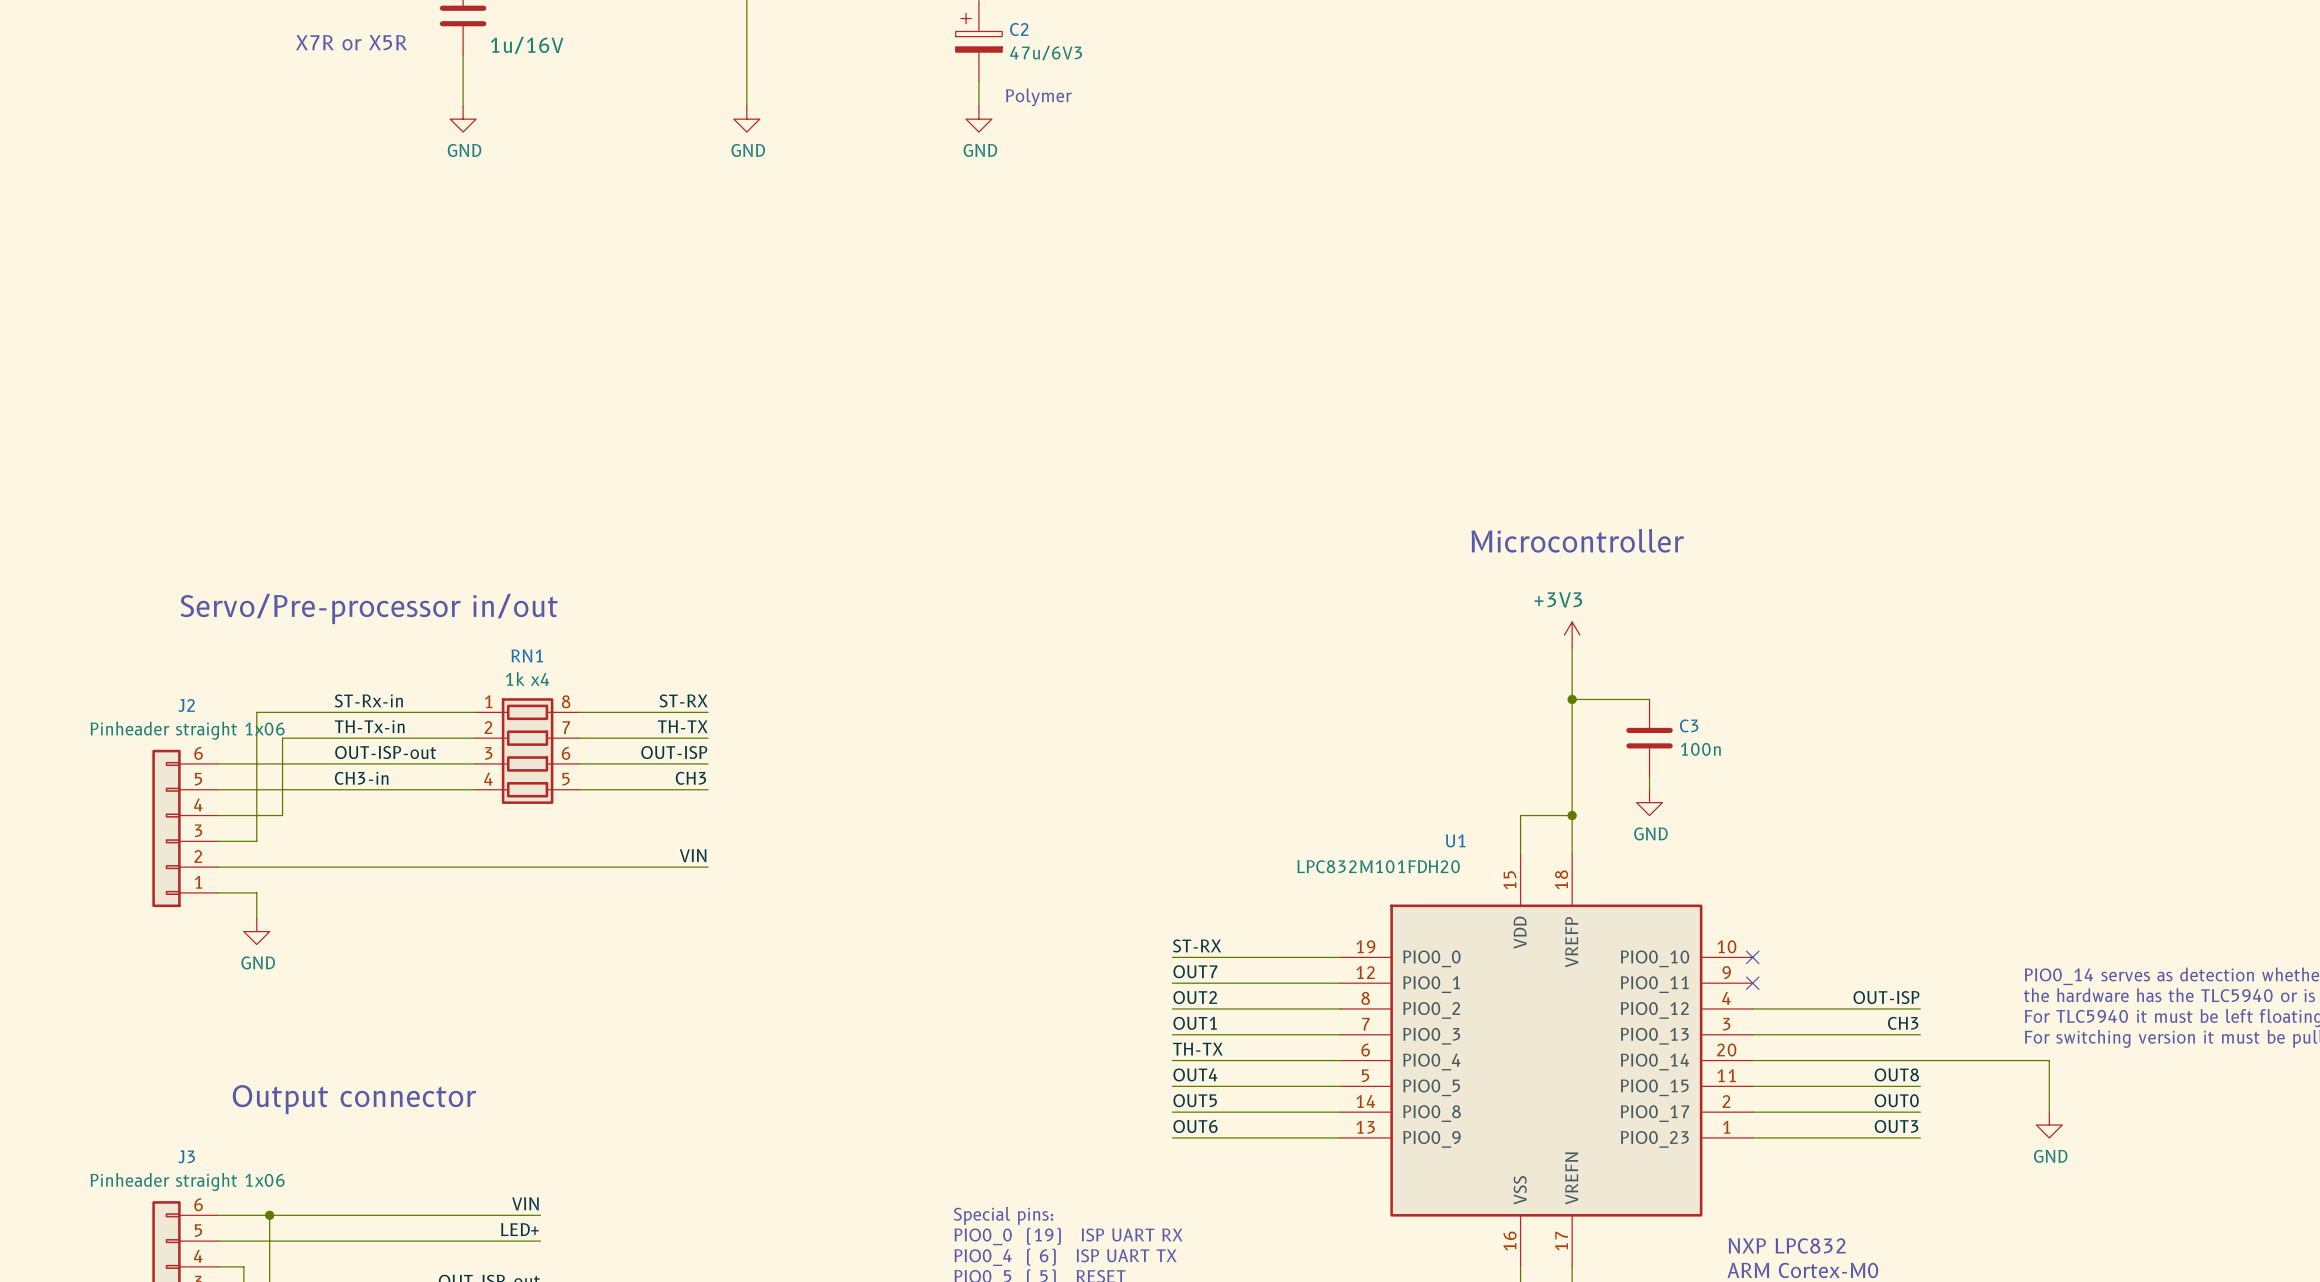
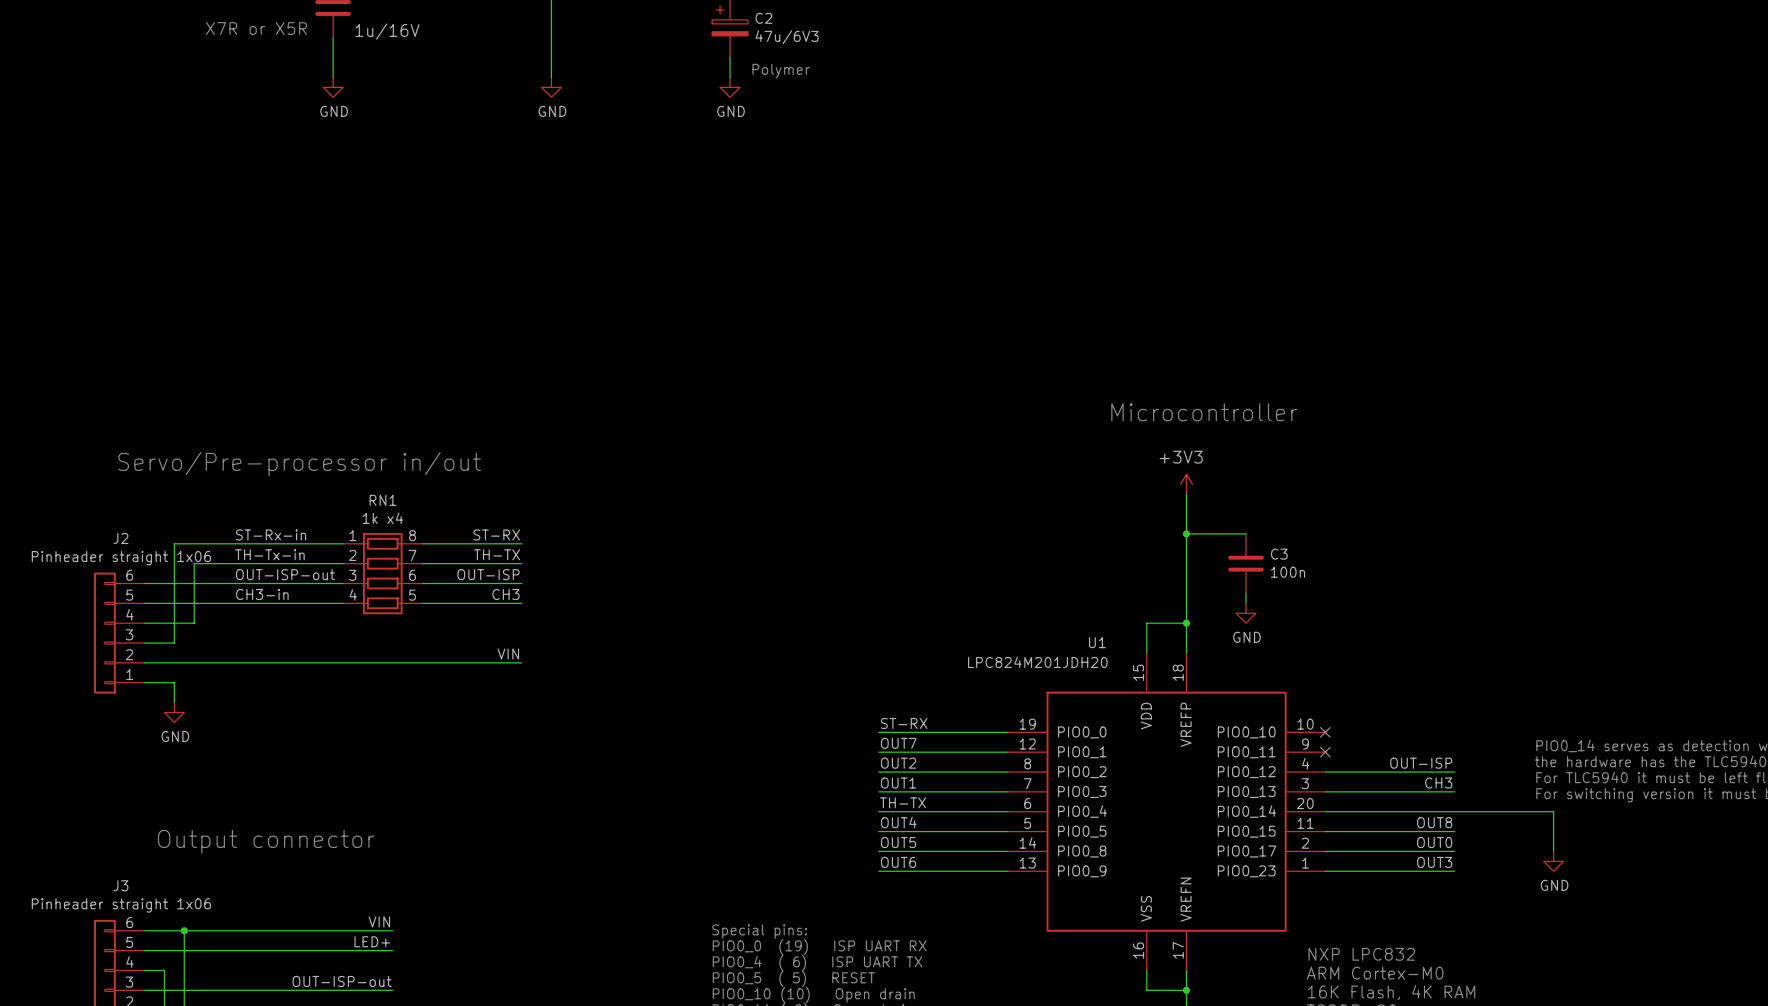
U1 value: LPC832M101FDH20 (1378, 866) -> LPC824M201JDH20 (1037, 662)

